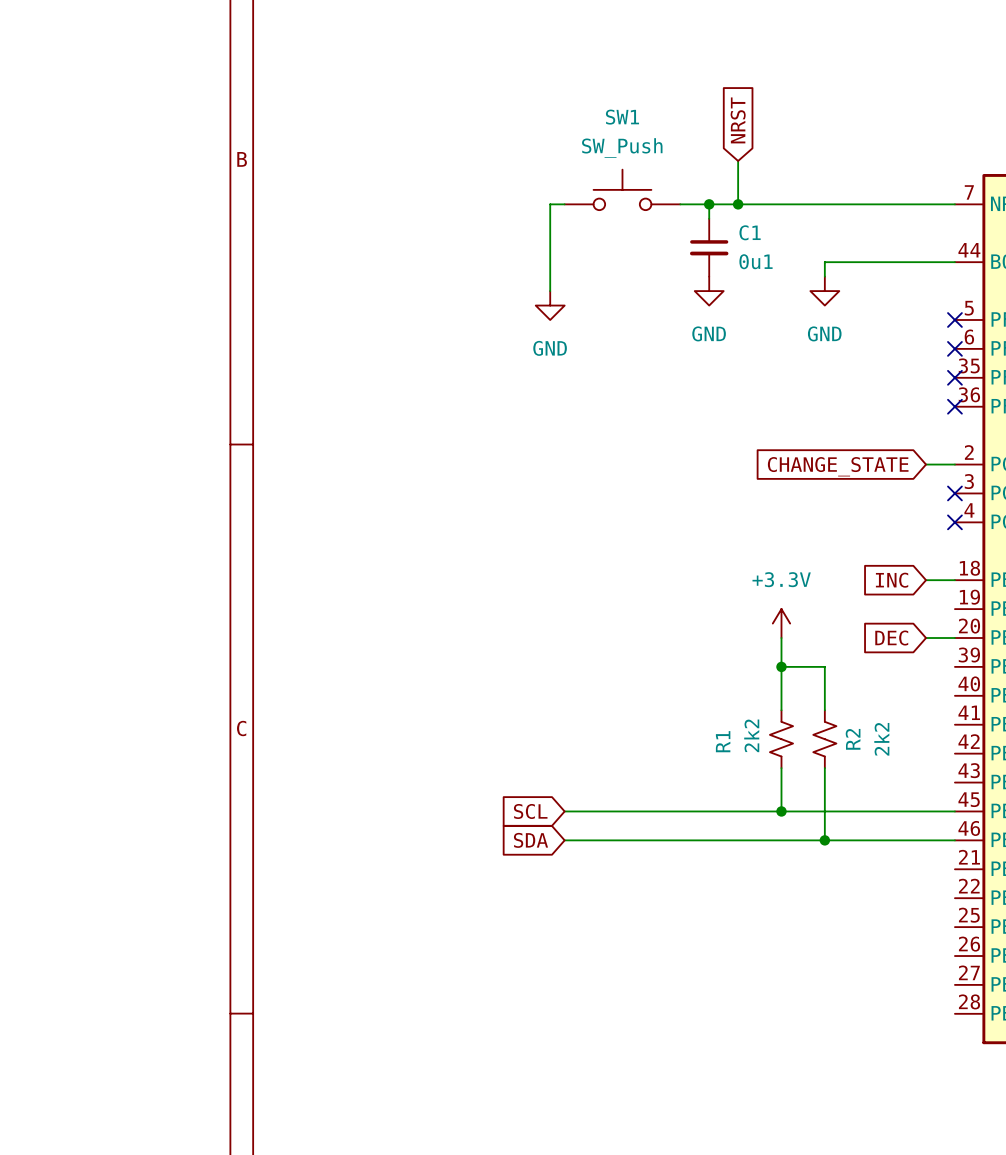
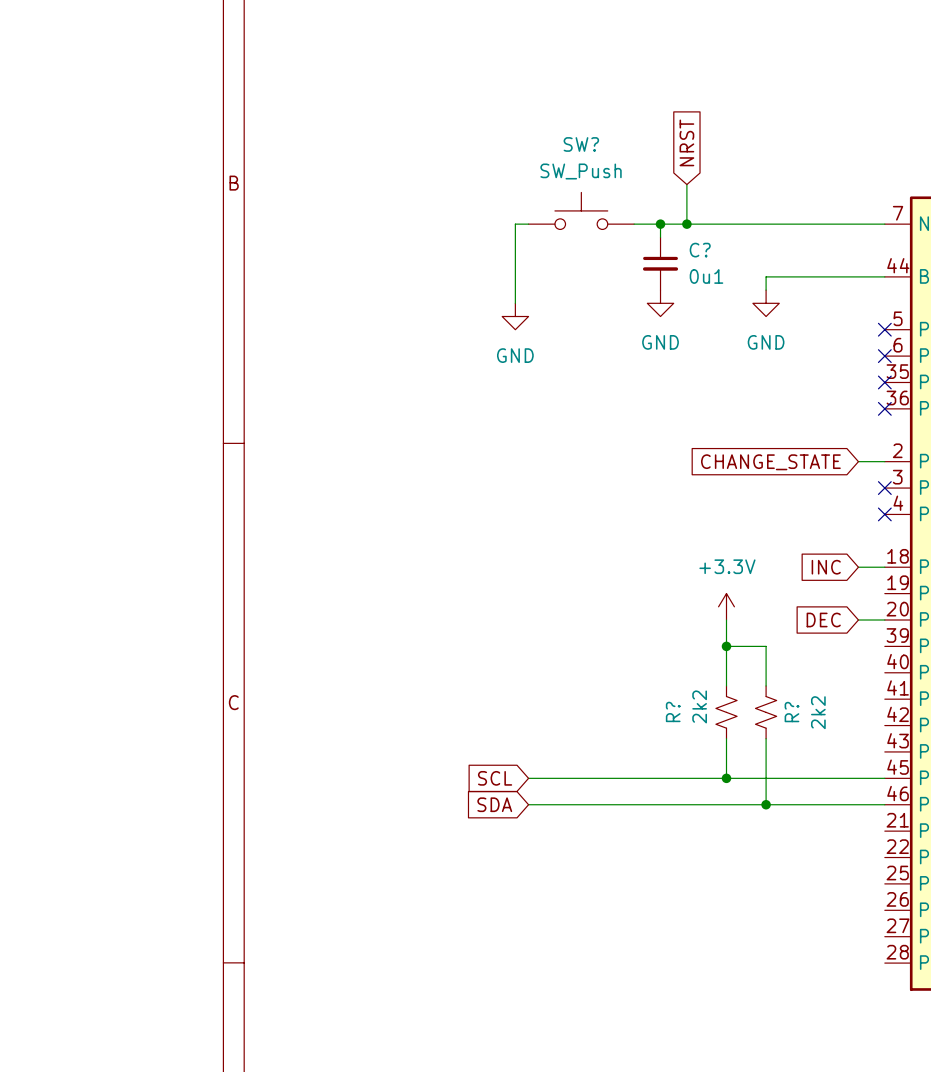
SW1 name: SW1 (622, 117) -> SW? (581, 144)
C1 name: C1 (750, 232) -> C? (700, 250)
R2 name: R2 (853, 739) -> R? (791, 712)
R1 name: R1 (723, 741) -> R? (673, 711)

